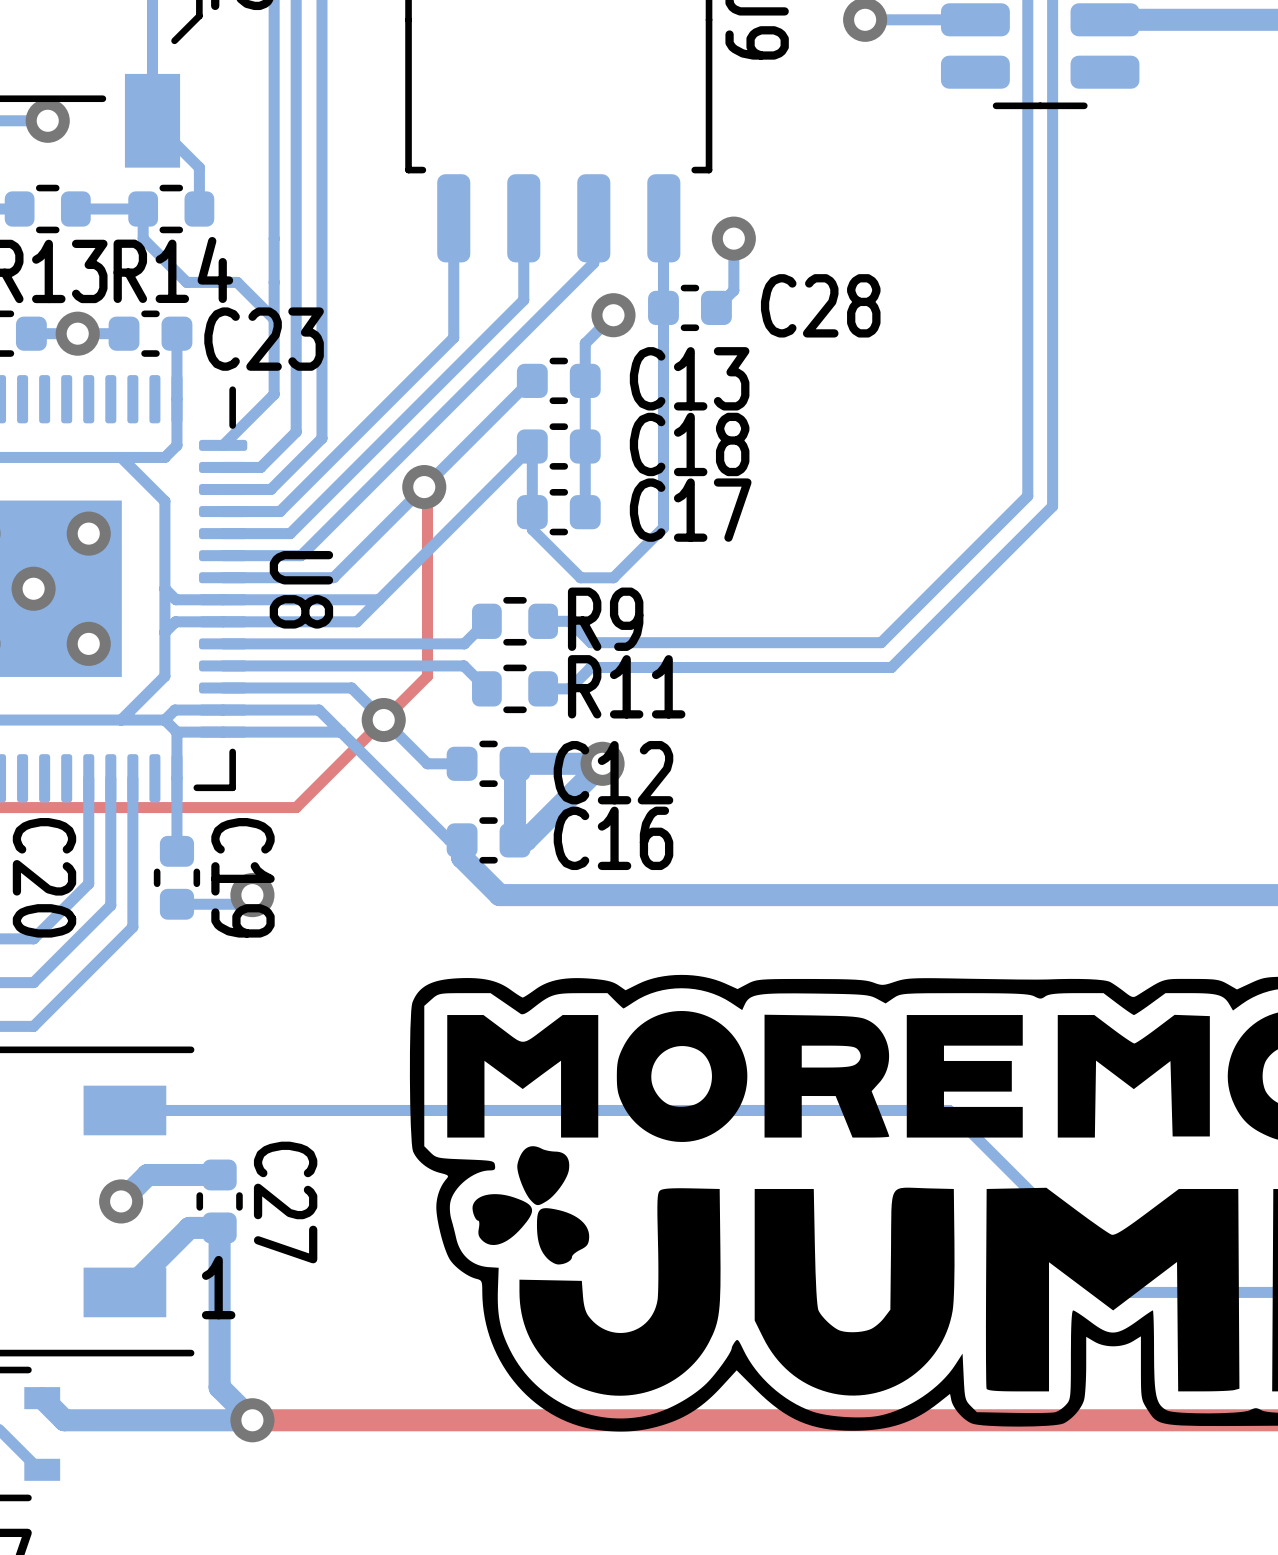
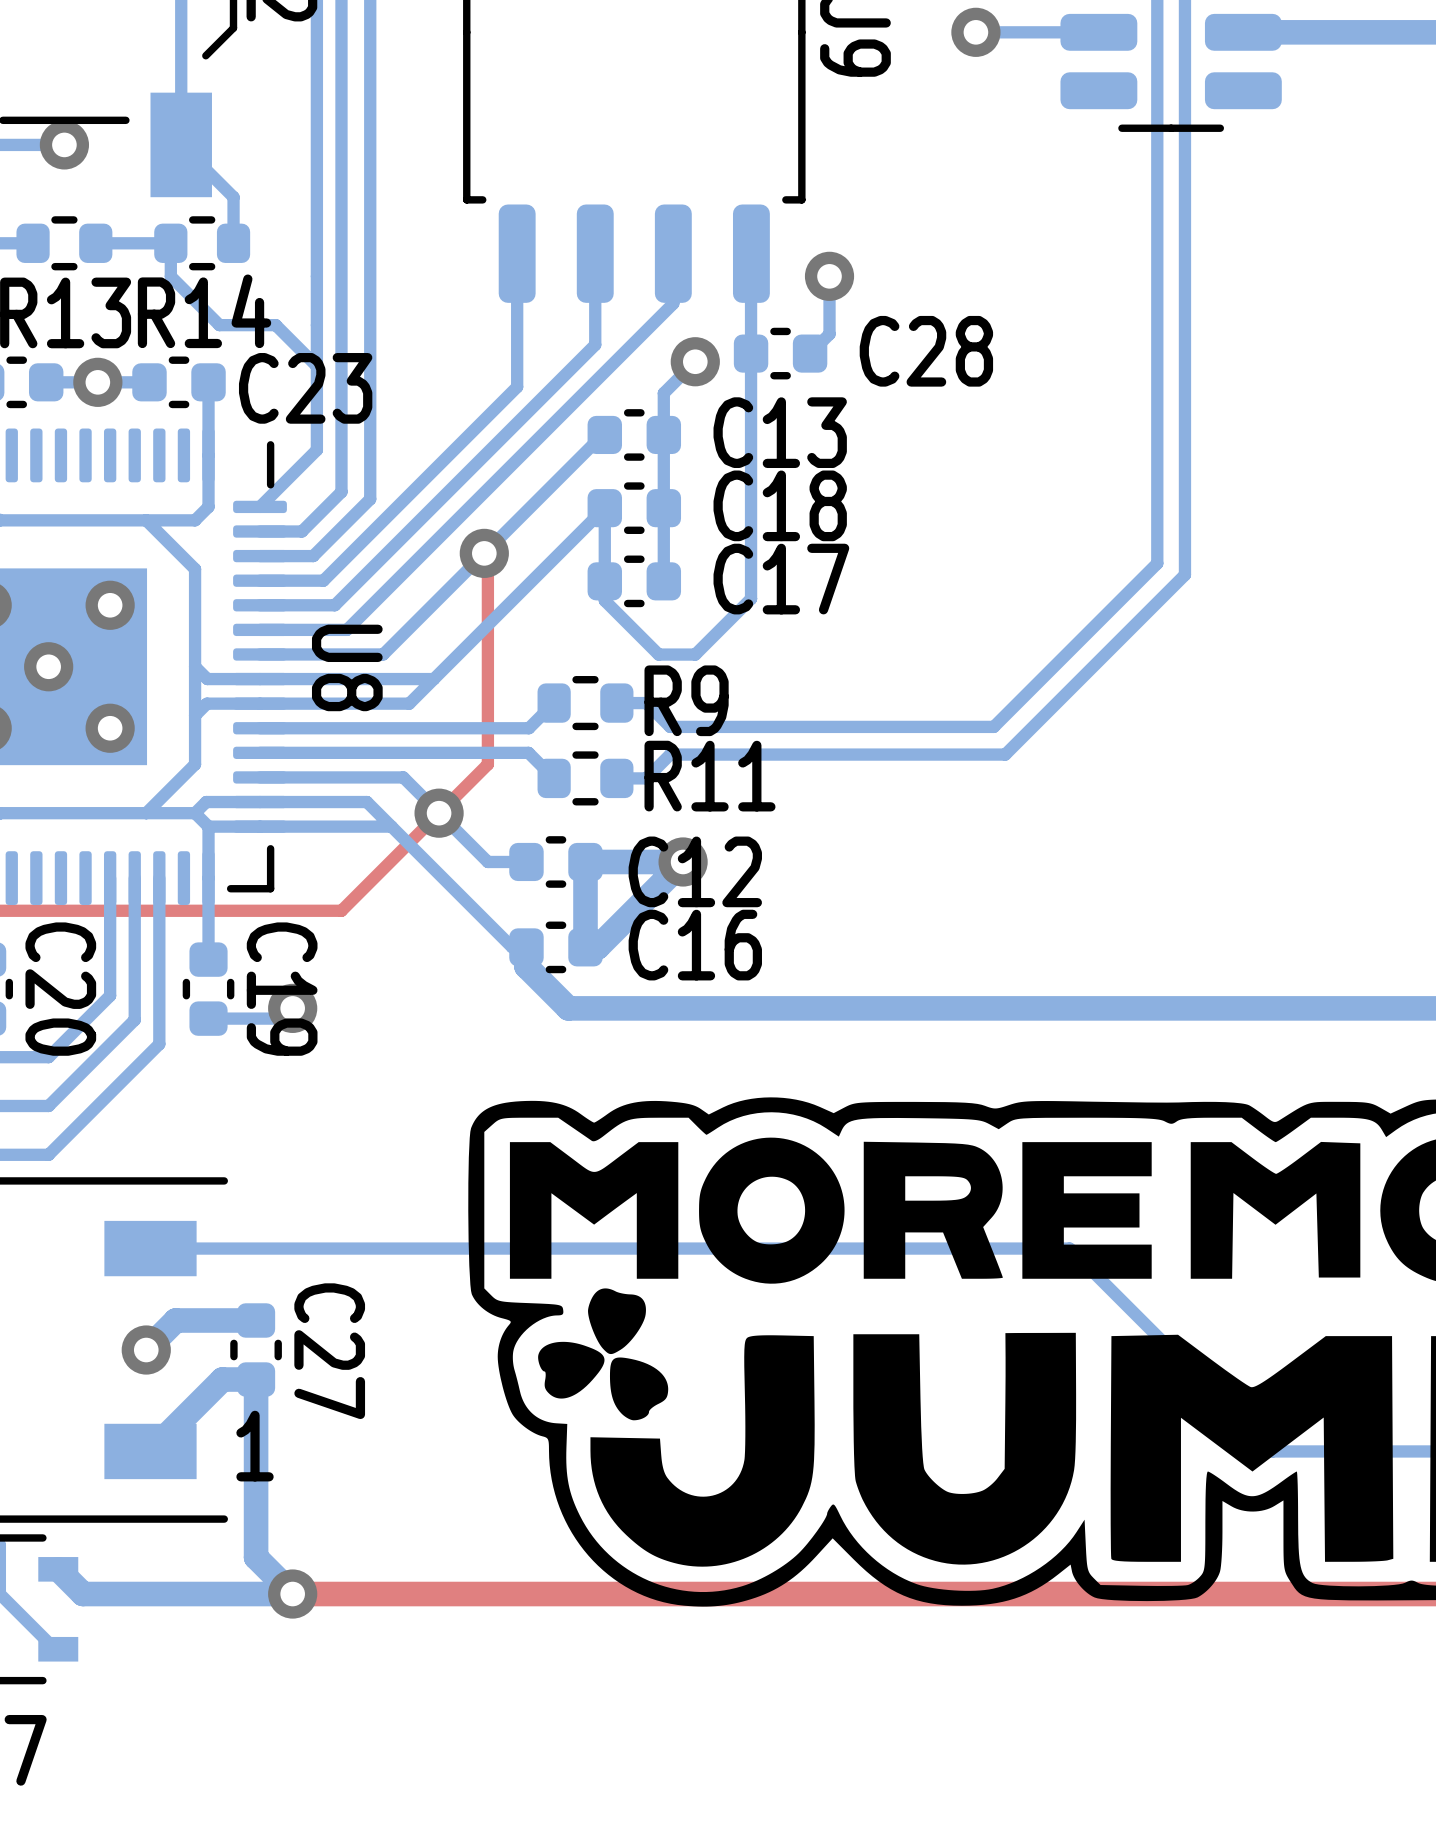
drawing shape: [754, 1187, 955, 1396] -> [853, 1332, 1077, 1565]

